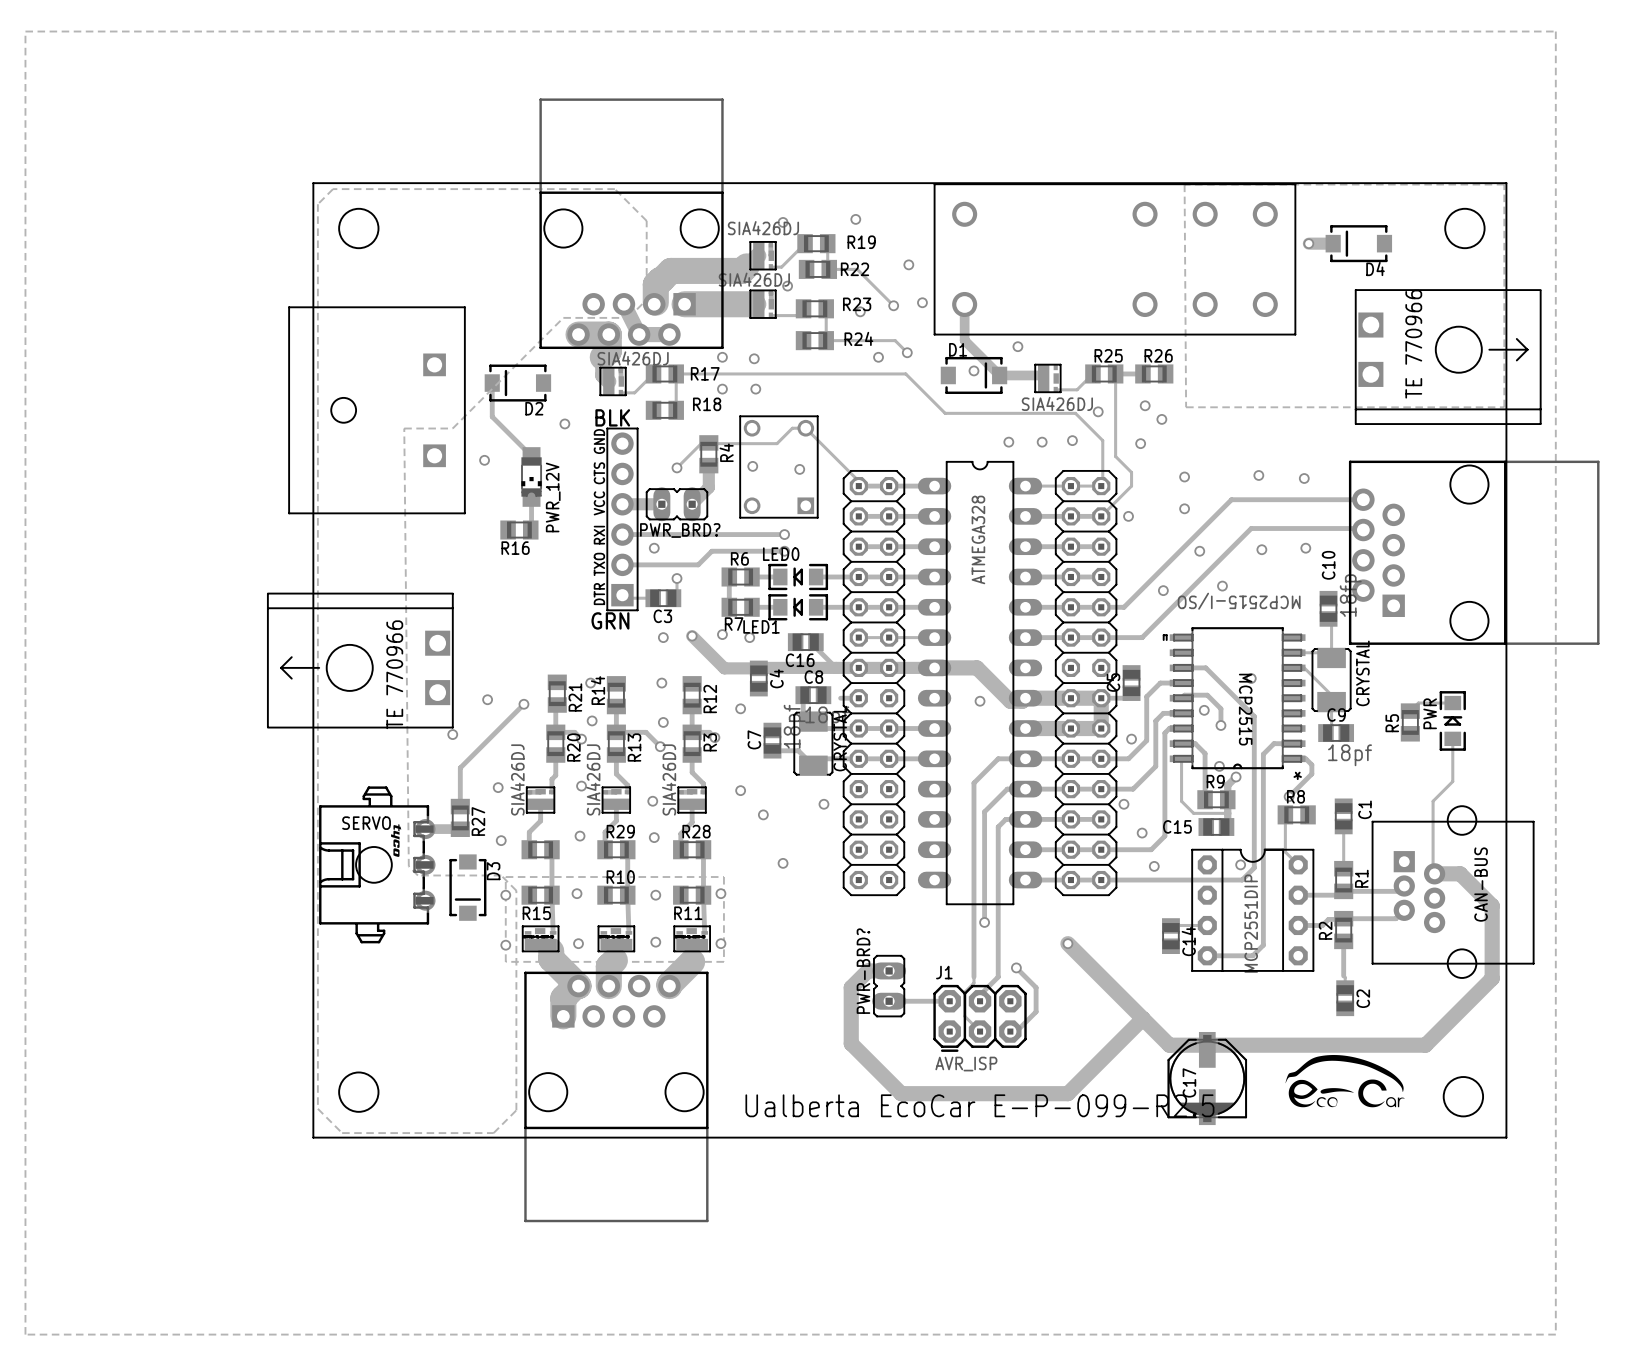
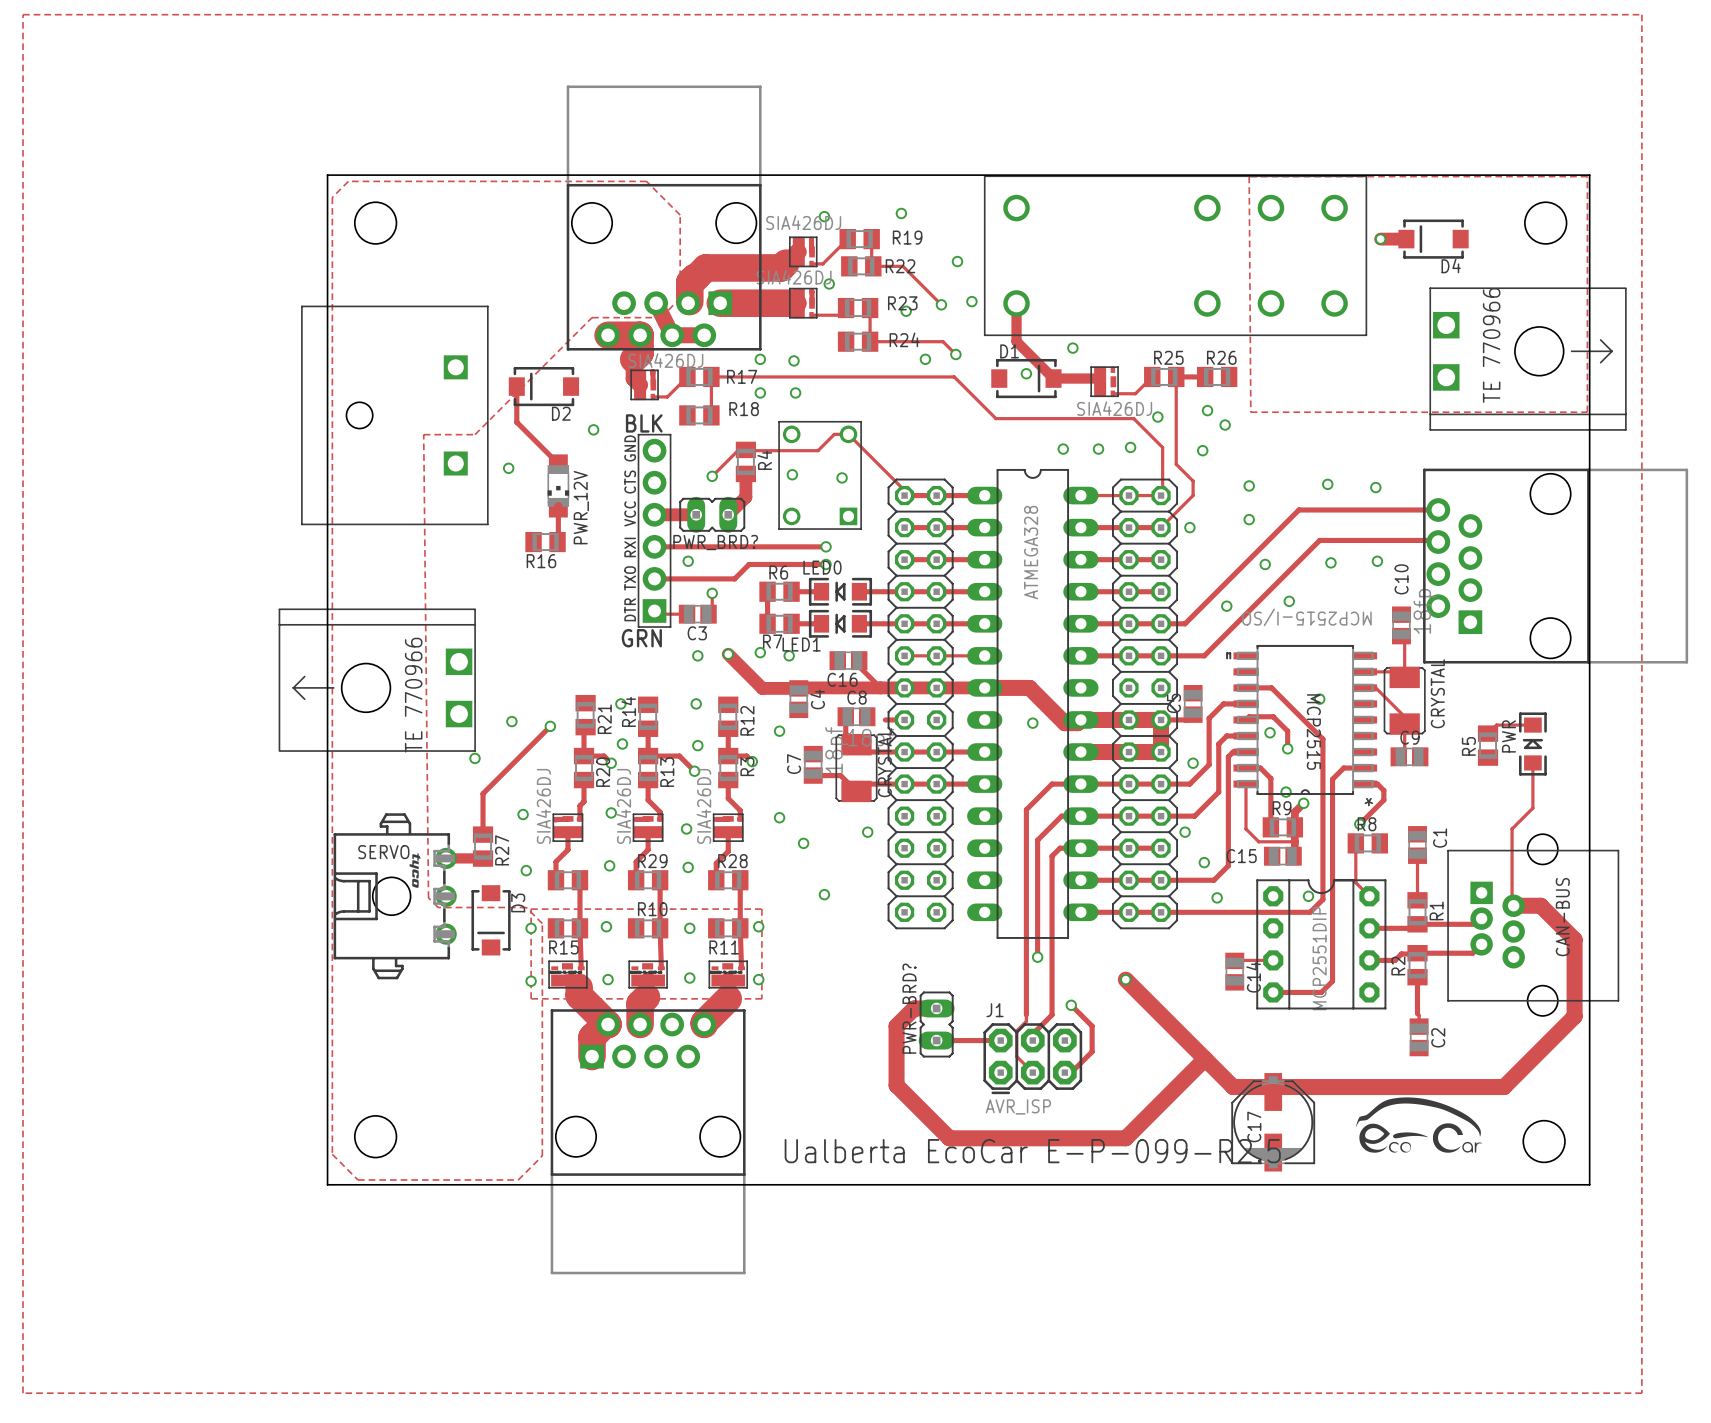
C9 value: 18pf (1350, 755) -> none

